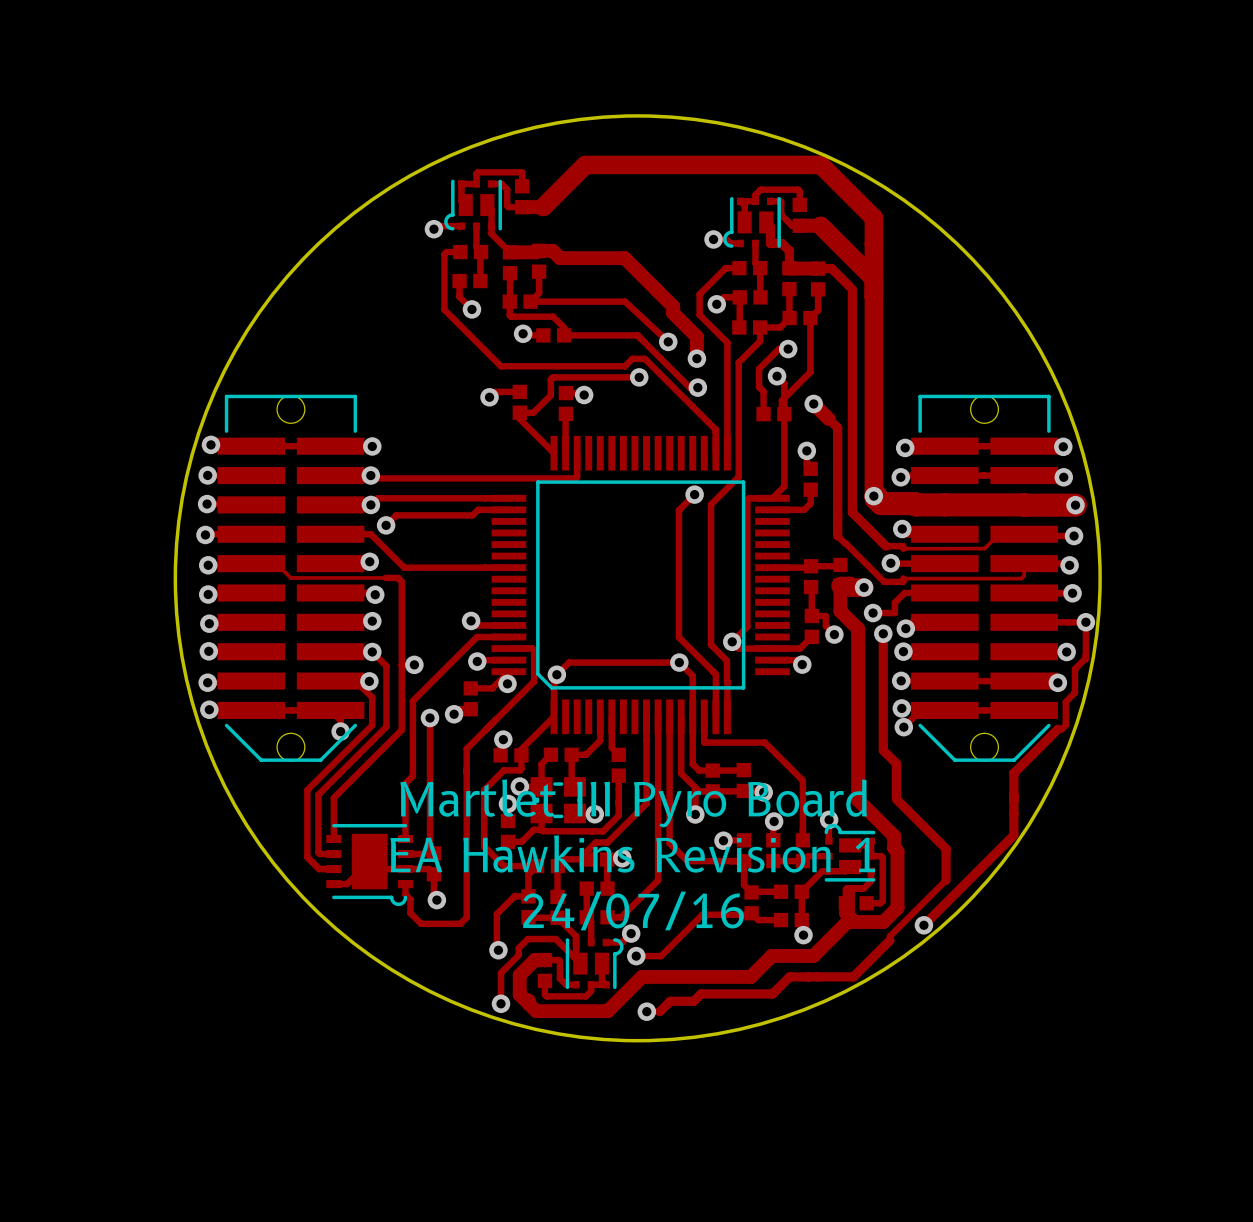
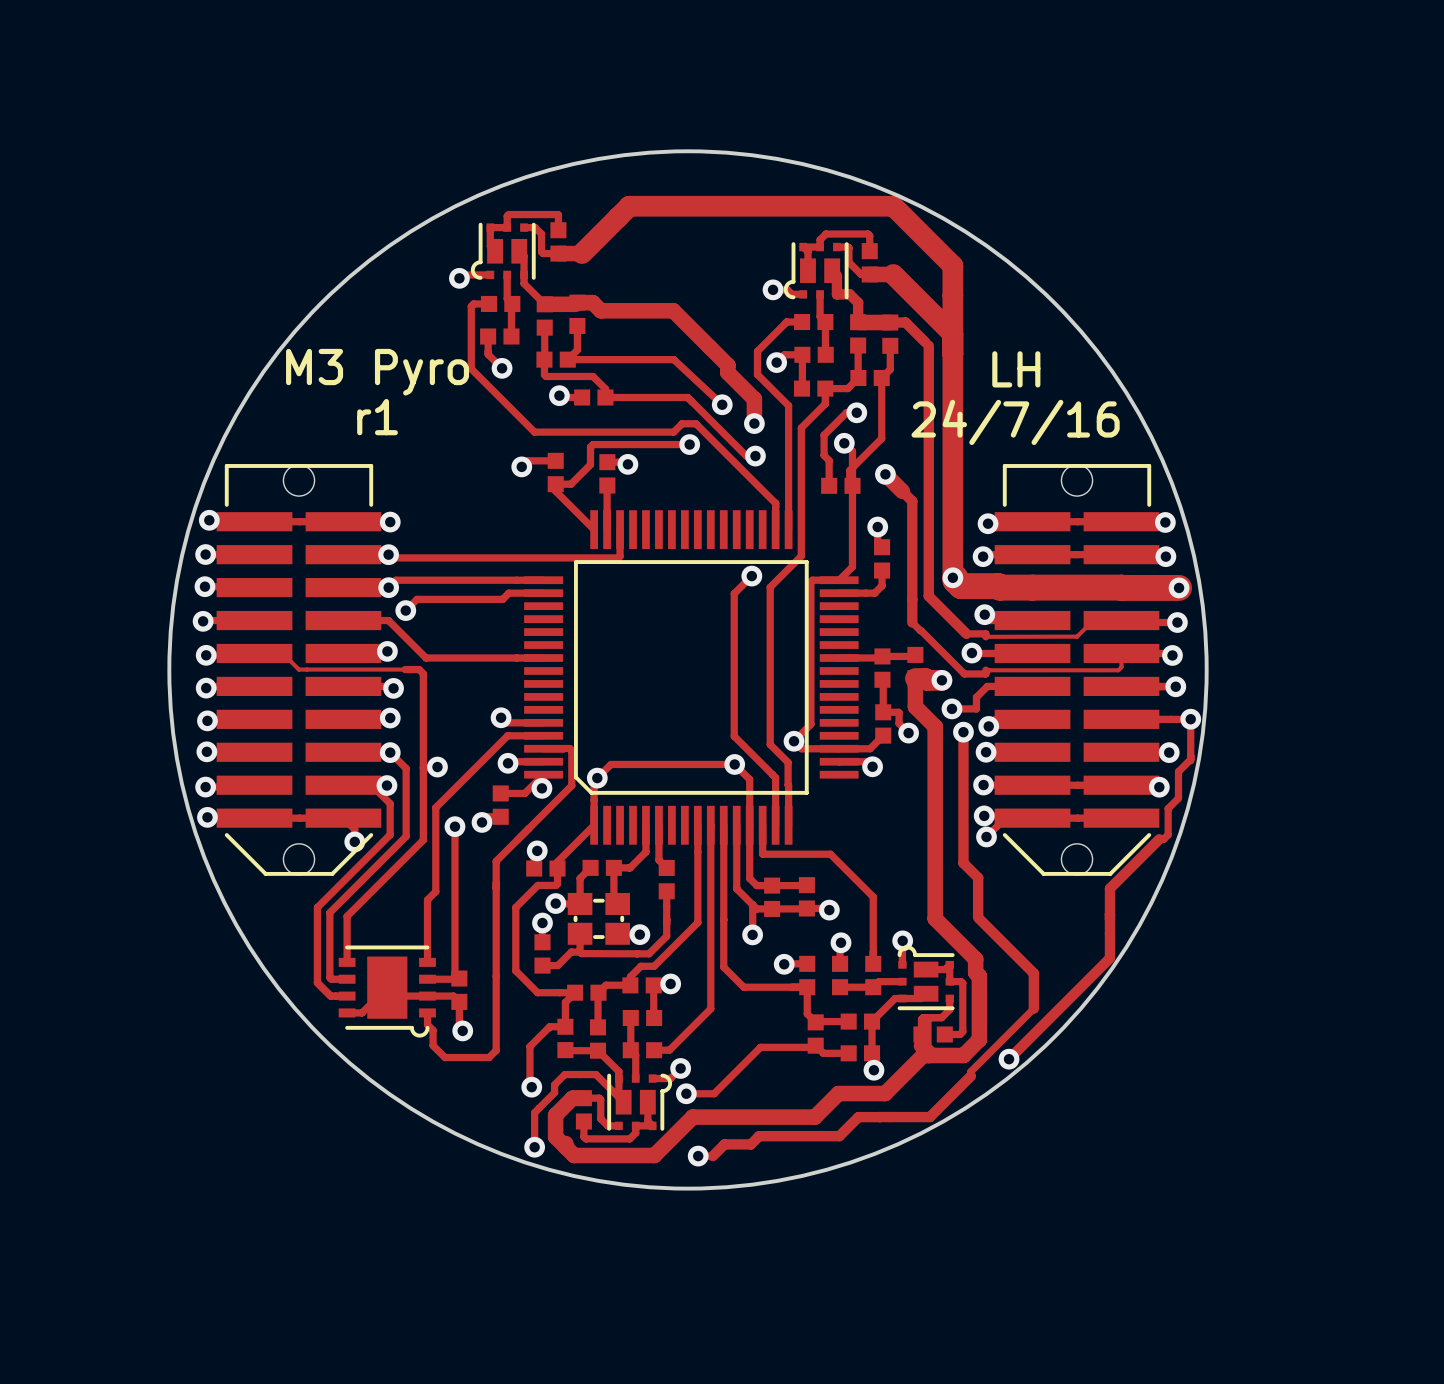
text: none -> LH (1016, 369)
text: none -> M3 Pyro (377, 372)
text: none -> r1 (377, 417)
text: none -> 24/7/16 (1015, 422)
text: Martlet III Pyro Board (633, 803) -> none
text: EA Hawkins Revision 1 (632, 853) -> none
text: 24/07/16 (633, 910) -> none

